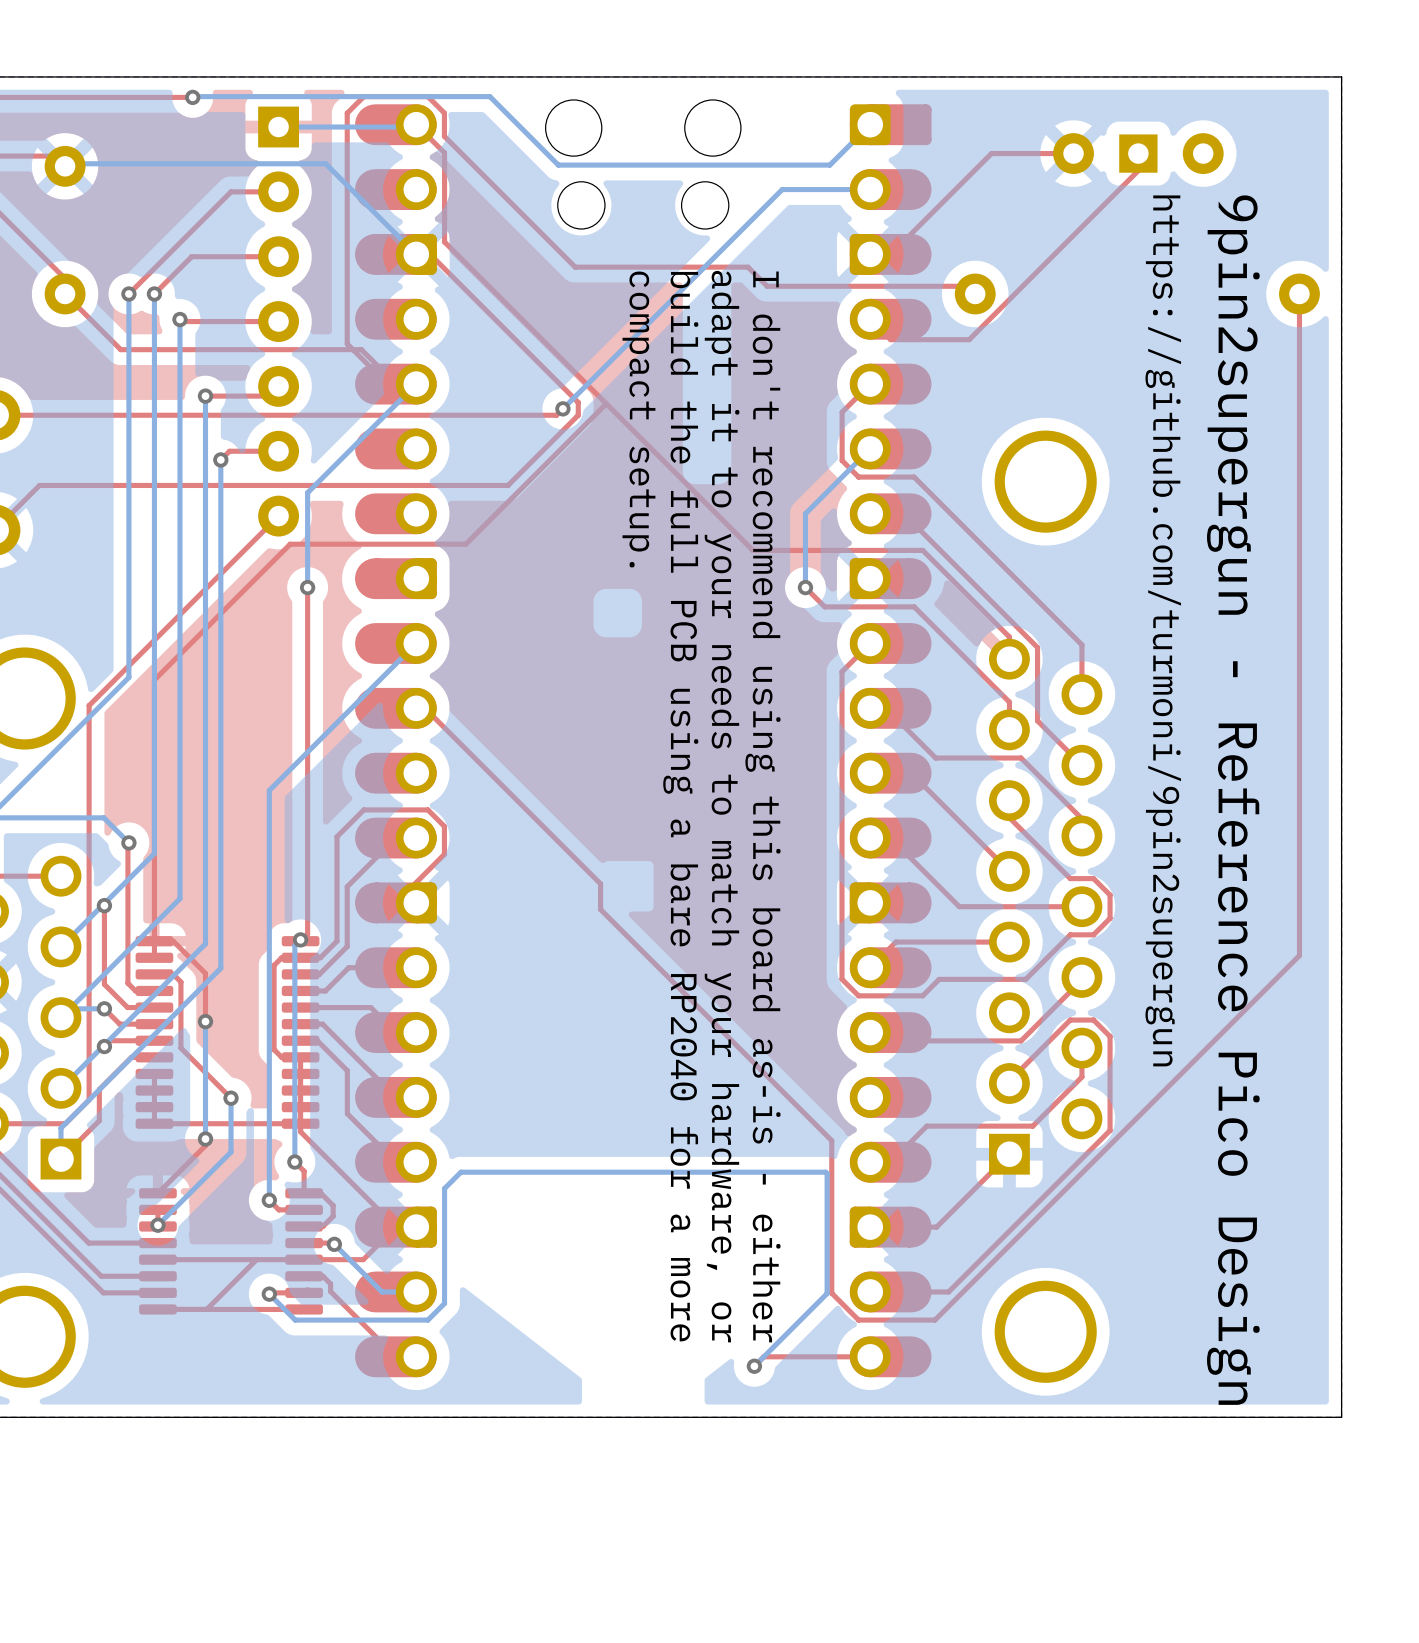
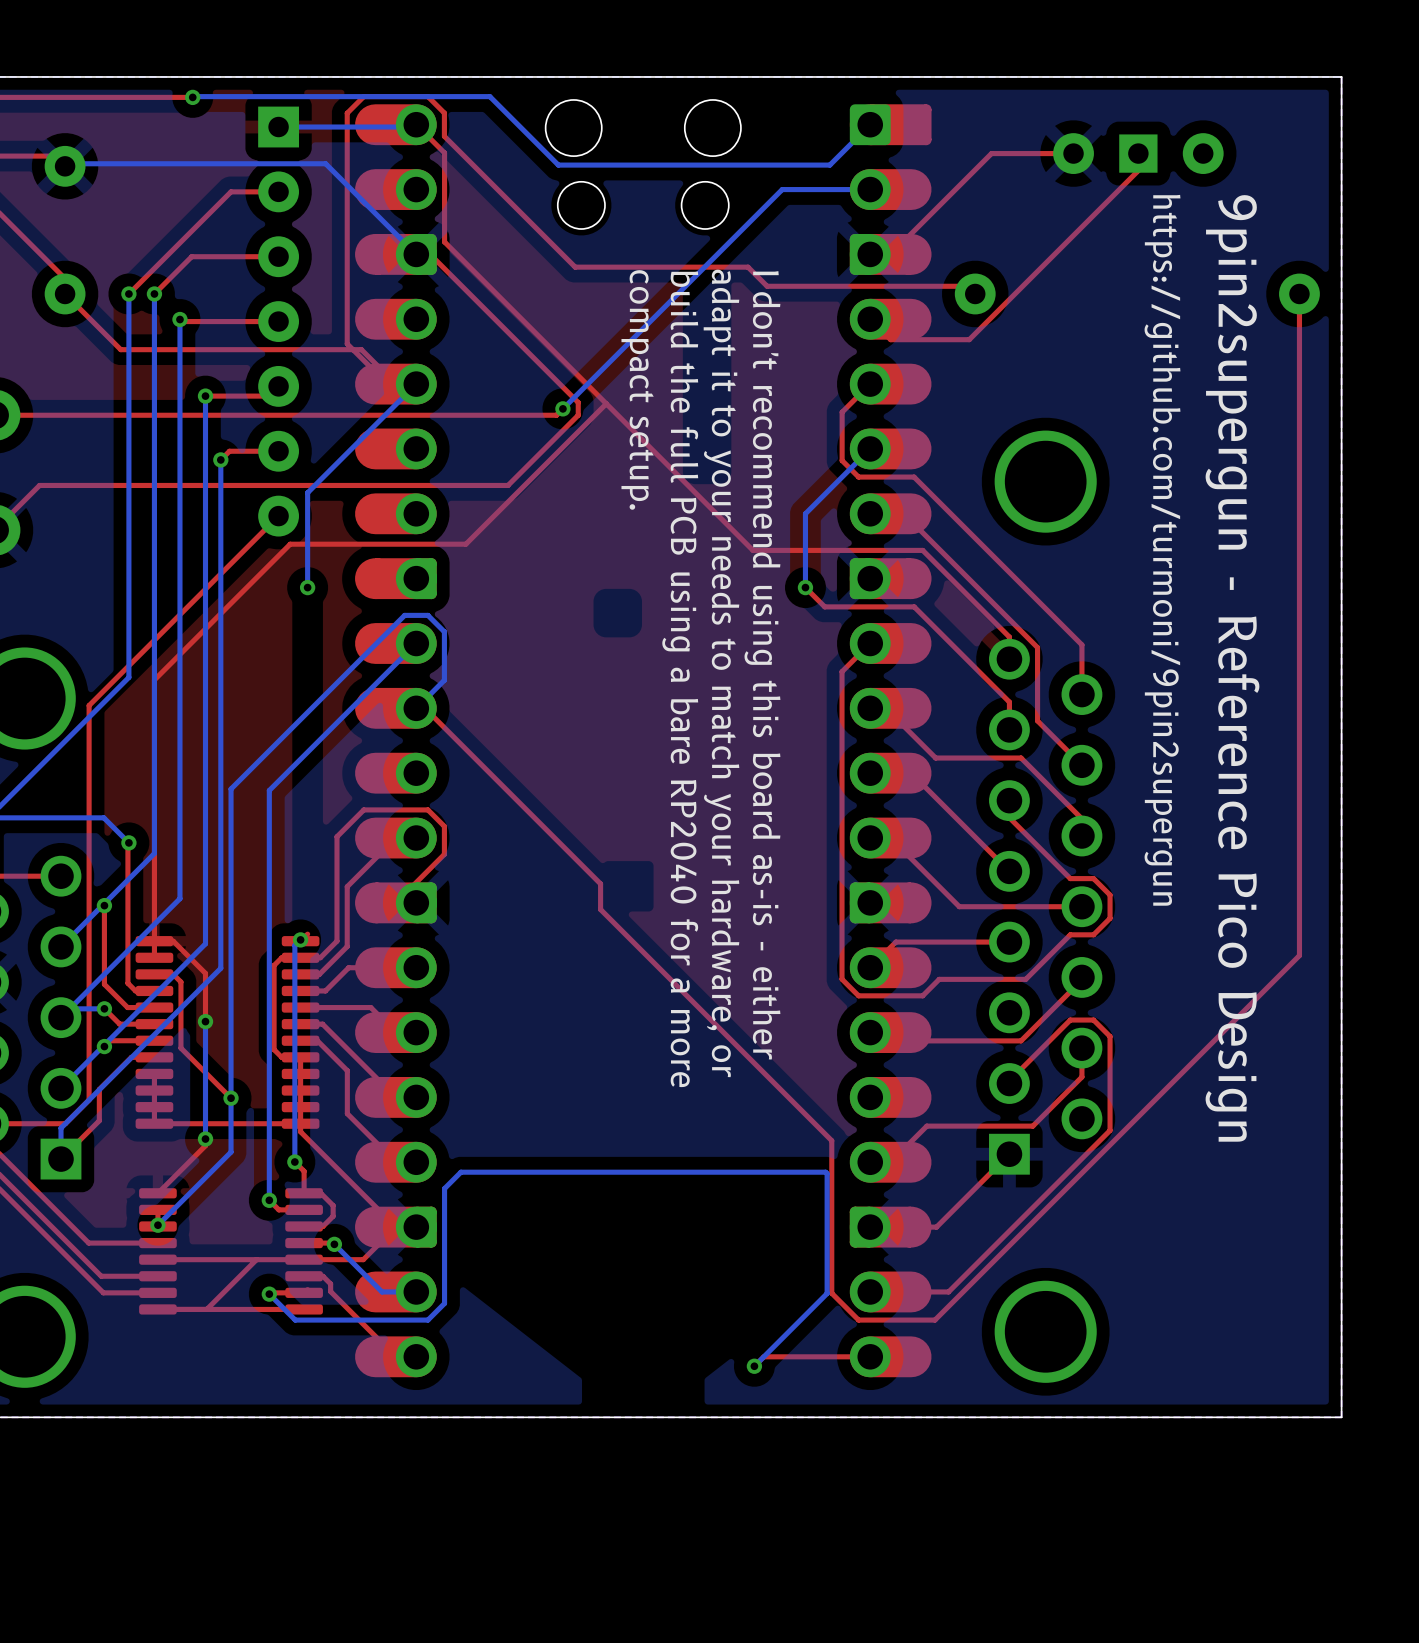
top track: (307, 587) (307, 934) -> none
bottom track: none -> (416, 708) (444, 680) (444, 631) (427, 615) (404, 615) (231, 789) (231, 1098)

